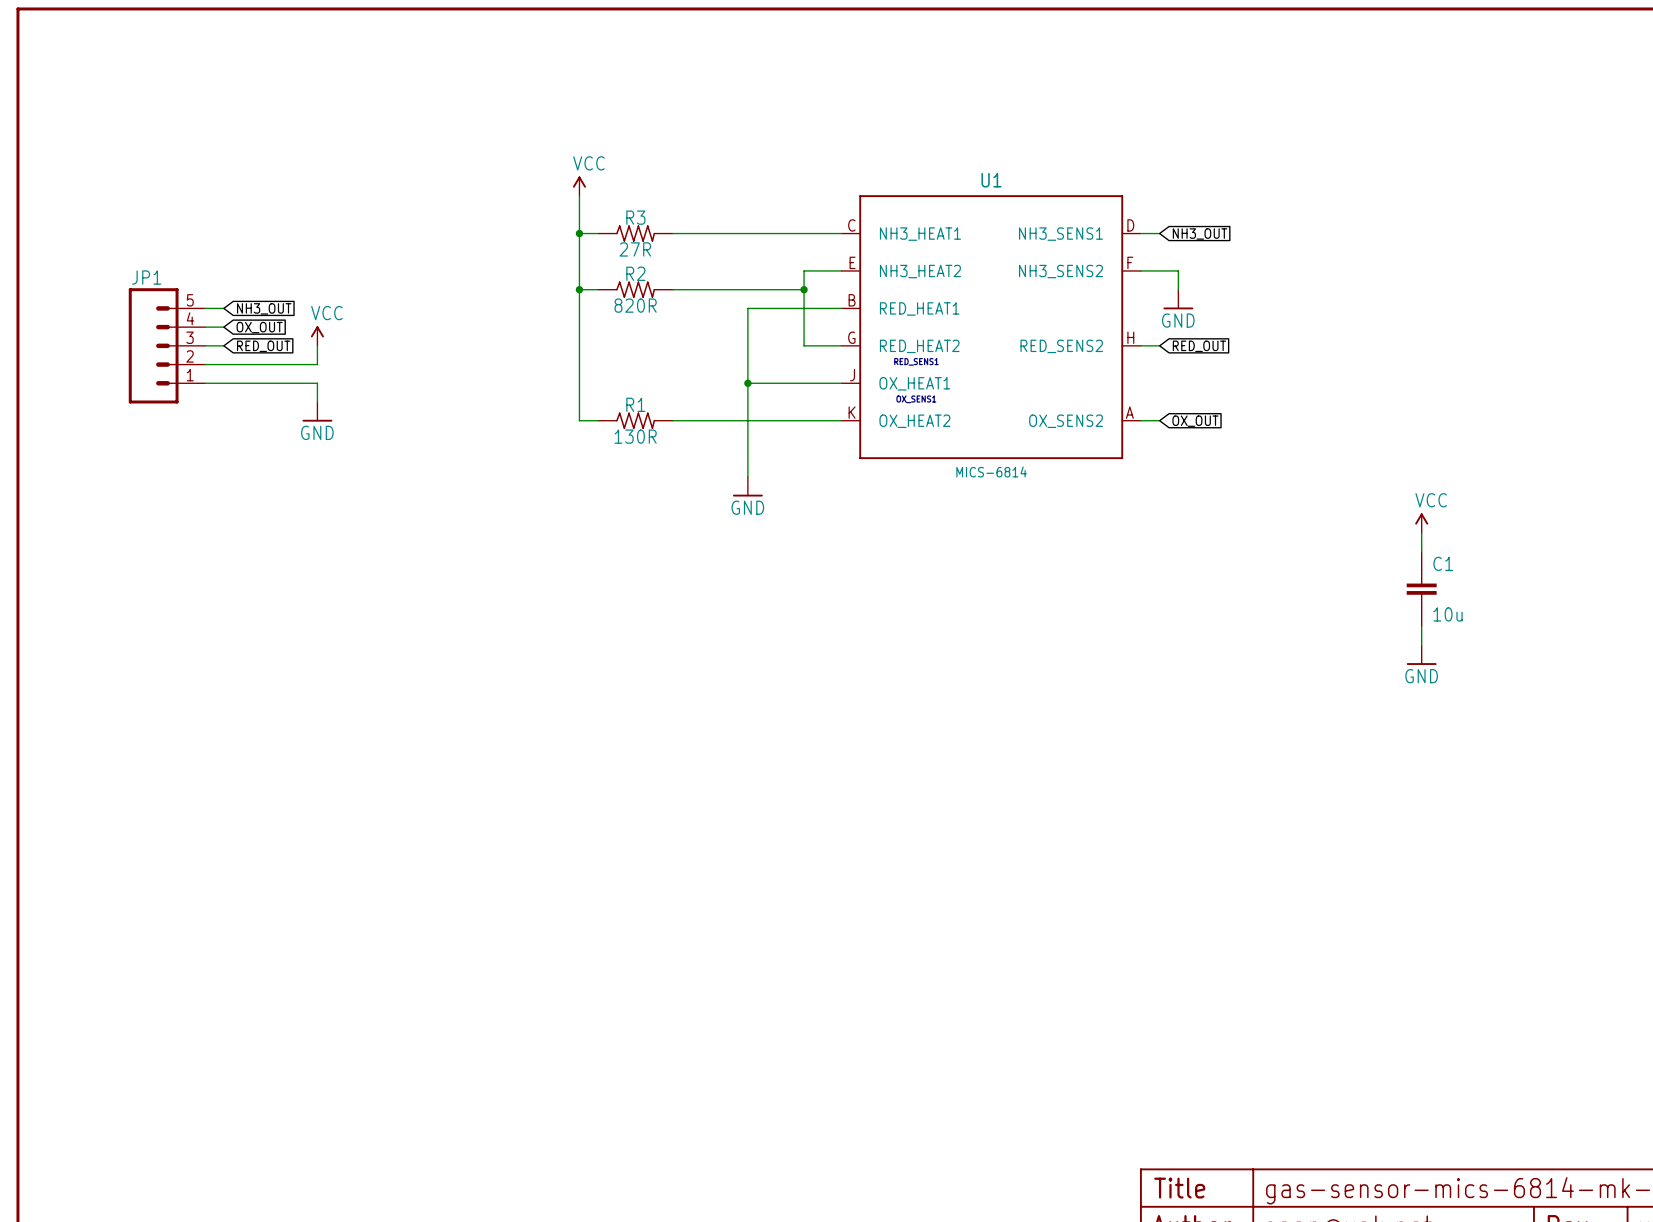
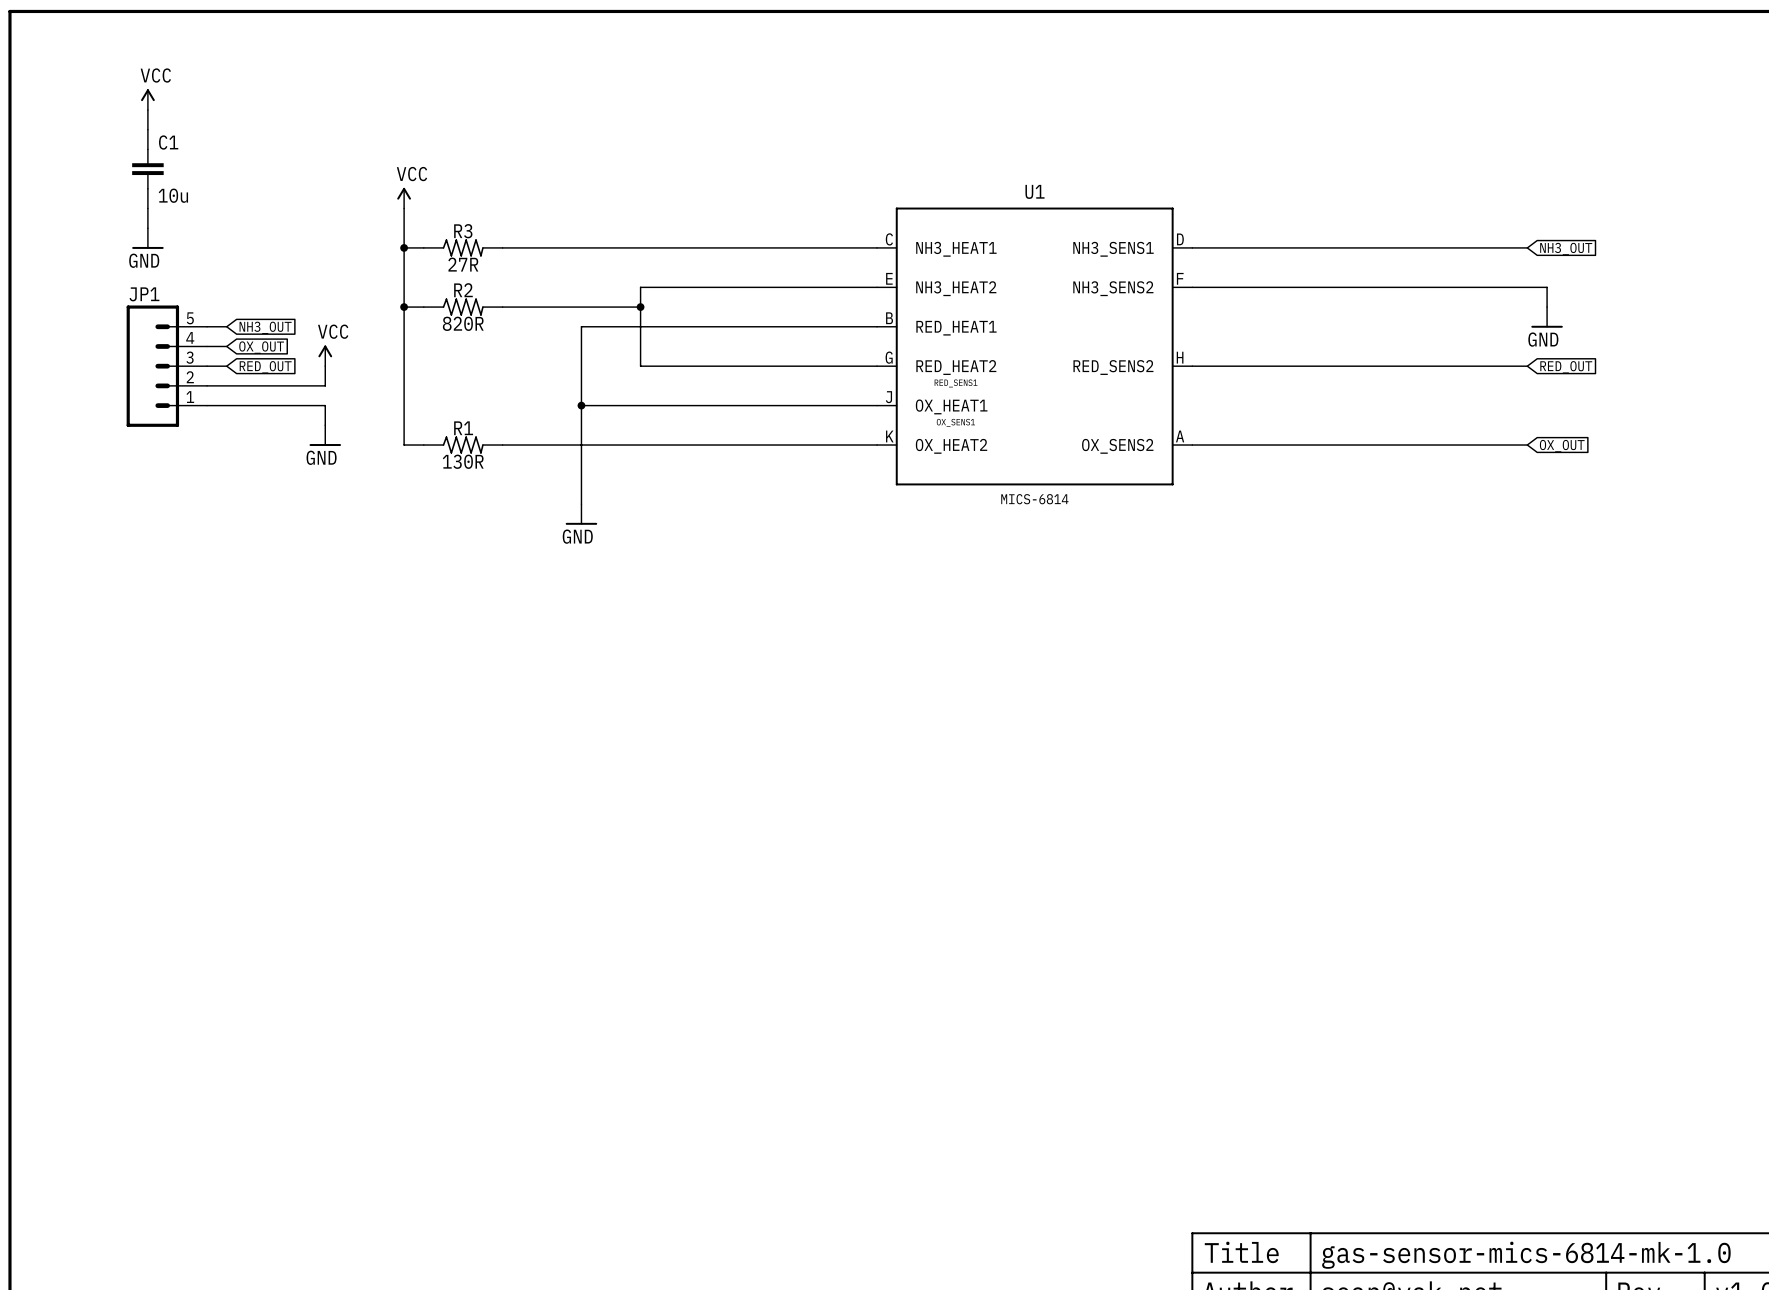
power symbol: none -> VCC (147, 99)
wire: none -> (147, 110) (147, 129)
power symbol: none -> VCC (404, 198)
power symbol: VCC (579, 186) -> none
wire: none -> (147, 208) (147, 228)
wire: none -> (404, 208) (404, 445) (423, 445)
wire: (579, 196) (579, 420) -> (502, 445) (601, 445)
power symbol: none -> GND (147, 238)
wire: none -> (404, 247) (423, 247)
junction: none -> (404, 247)
wire: none -> (502, 247) (601, 247)
junction: (579, 233) -> none
R3 position: (635, 233) -> (463, 247)
wire: none -> (1212, 247) (1527, 247)
global label: NH3_OUT (1200, 234) -> none
global label: none -> NH3_OUT (1566, 249)
wire: (804, 270) (804, 345) -> (837, 287) (640, 287) (640, 366) (837, 366)
wire: (1178, 270) (1178, 289) -> (1231, 287) (1547, 287) (1547, 307)
wire: none -> (404, 307) (423, 307)
junction: none -> (404, 307)
wire: none -> (502, 307) (601, 307)
junction: (579, 289) -> none
junction: none -> (640, 307)
R2 position: (635, 289) -> (463, 307)
wire: (673, 289) (804, 289) -> none
junction: (804, 289) -> none
power symbol: GND (1178, 299) -> none
power symbol: none -> GND (1547, 317)
wire: (747, 308) (747, 476) -> (778, 326) (581, 326) (581, 504)
wire: none -> (1212, 366) (1527, 366)
global label: RED_OUT (1199, 346) -> none
global label: none -> RED_OUT (1566, 367)
wire: none -> (581, 405) (778, 405)
junction: none -> (581, 405)
junction: (747, 383) -> none
R1 position: (635, 420) -> (463, 445)
wire: none -> (1212, 445) (1527, 445)
global label: OX_OUT (1195, 421) -> none
global label: none -> OX_OUT (1562, 446)
power symbol: none -> GND (581, 514)
power symbol: GND (747, 486) -> none
power symbol: VCC (1421, 523) -> none
wire: (1421, 533) (1421, 551) -> none
C1 position: (1421, 589) -> (147, 169)
wire: (1421, 626) (1421, 645) -> none
power symbol: GND (1421, 655) -> none

